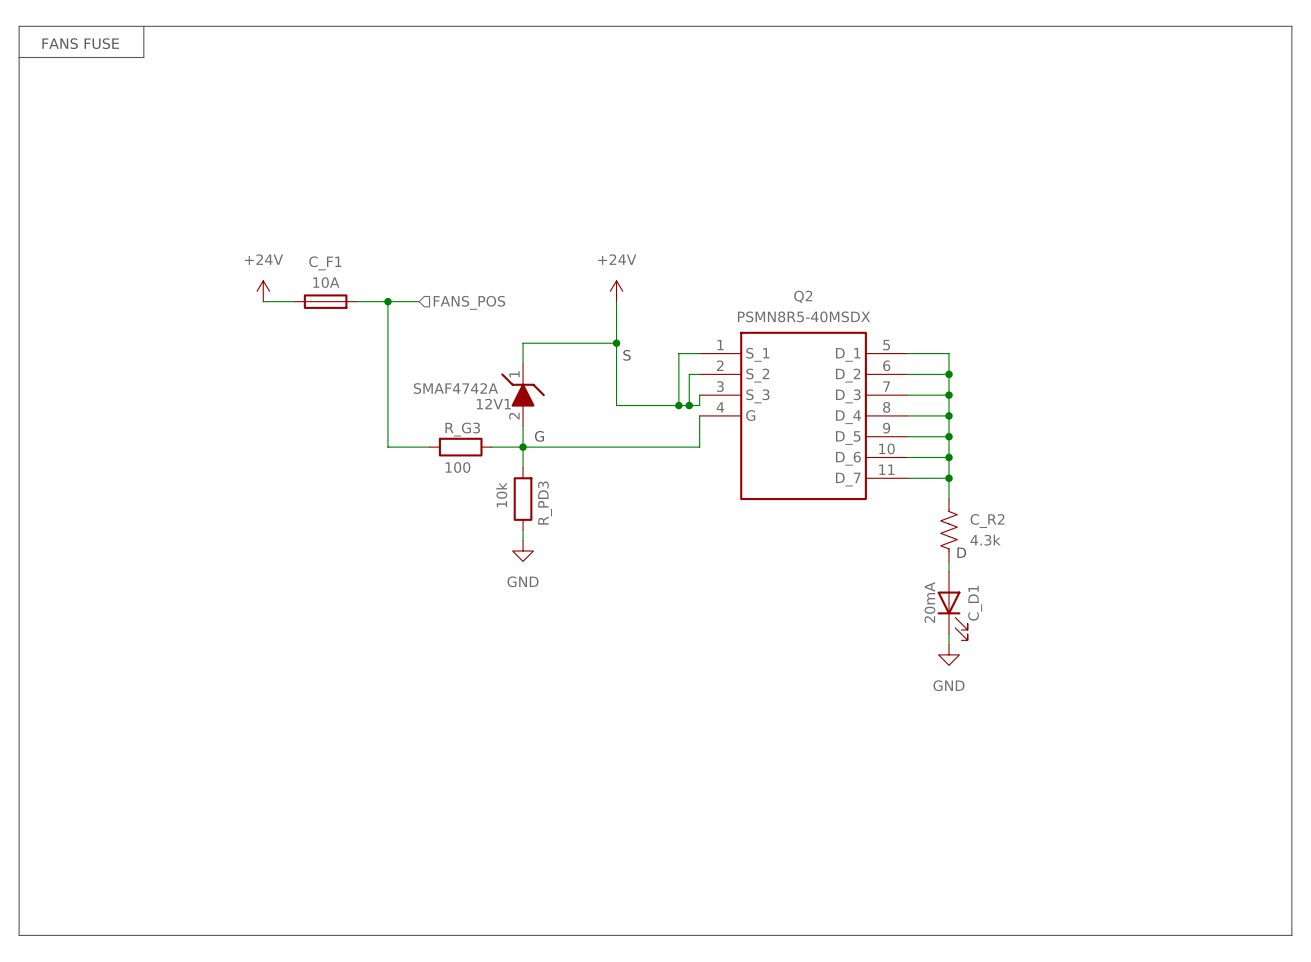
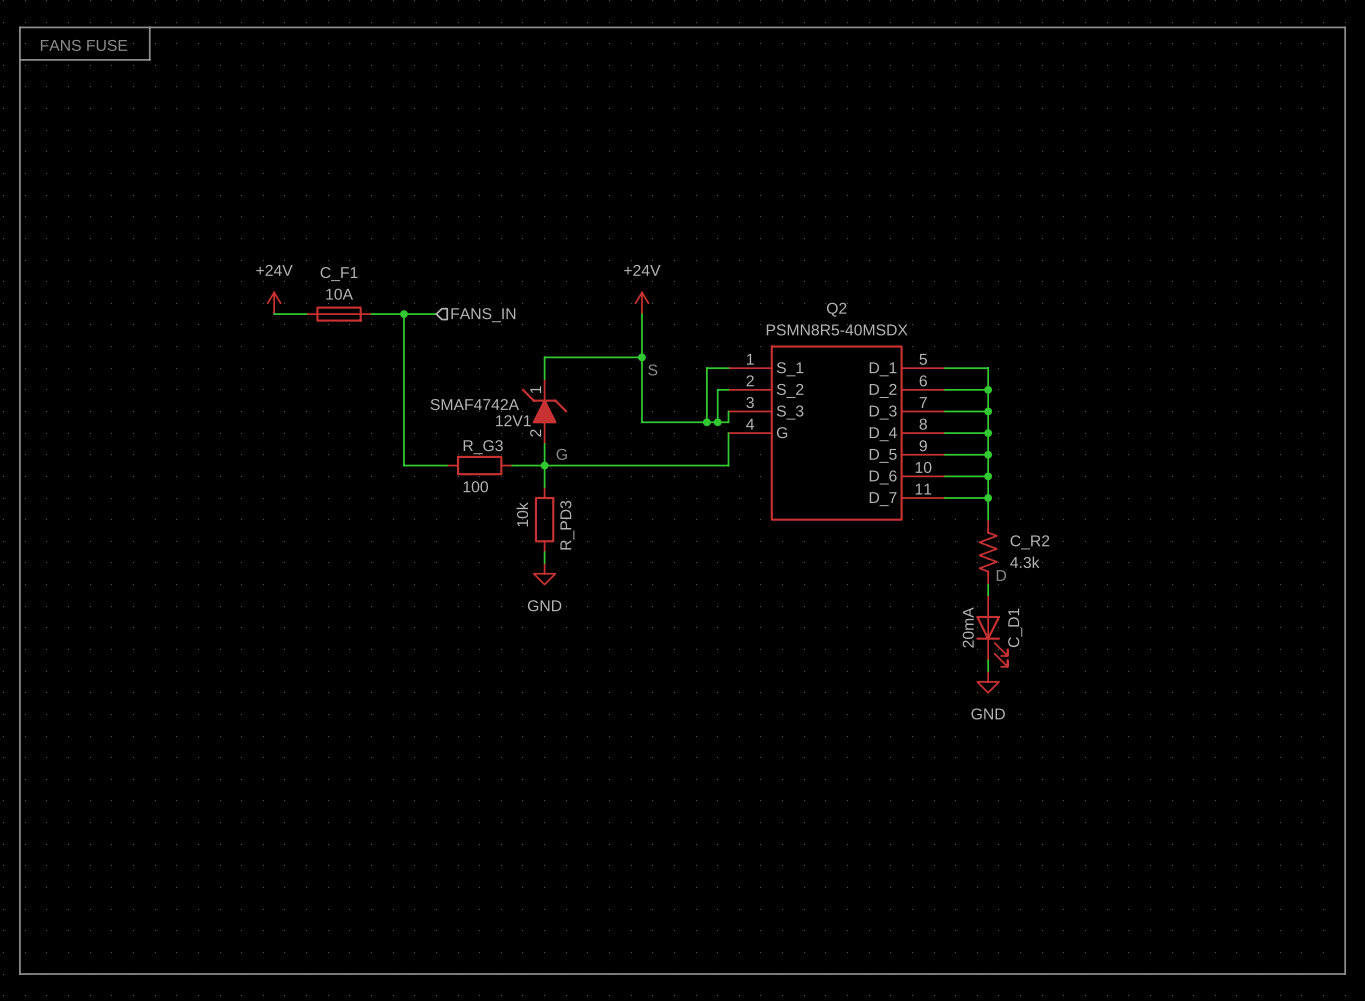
hierarchical label: FANS_POS (469, 302) -> FANS_IN (483, 315)

